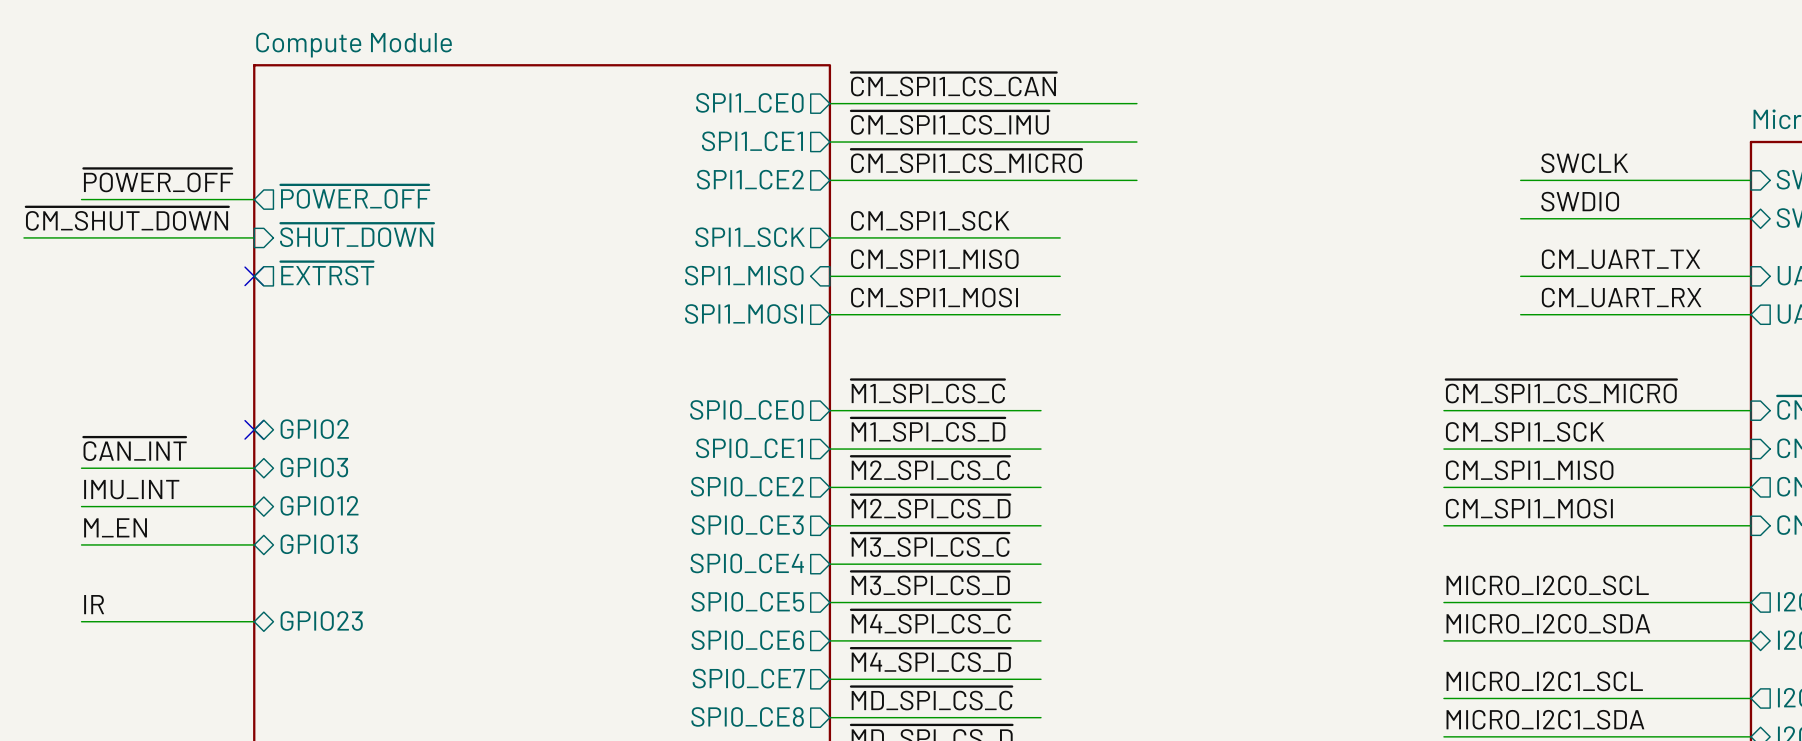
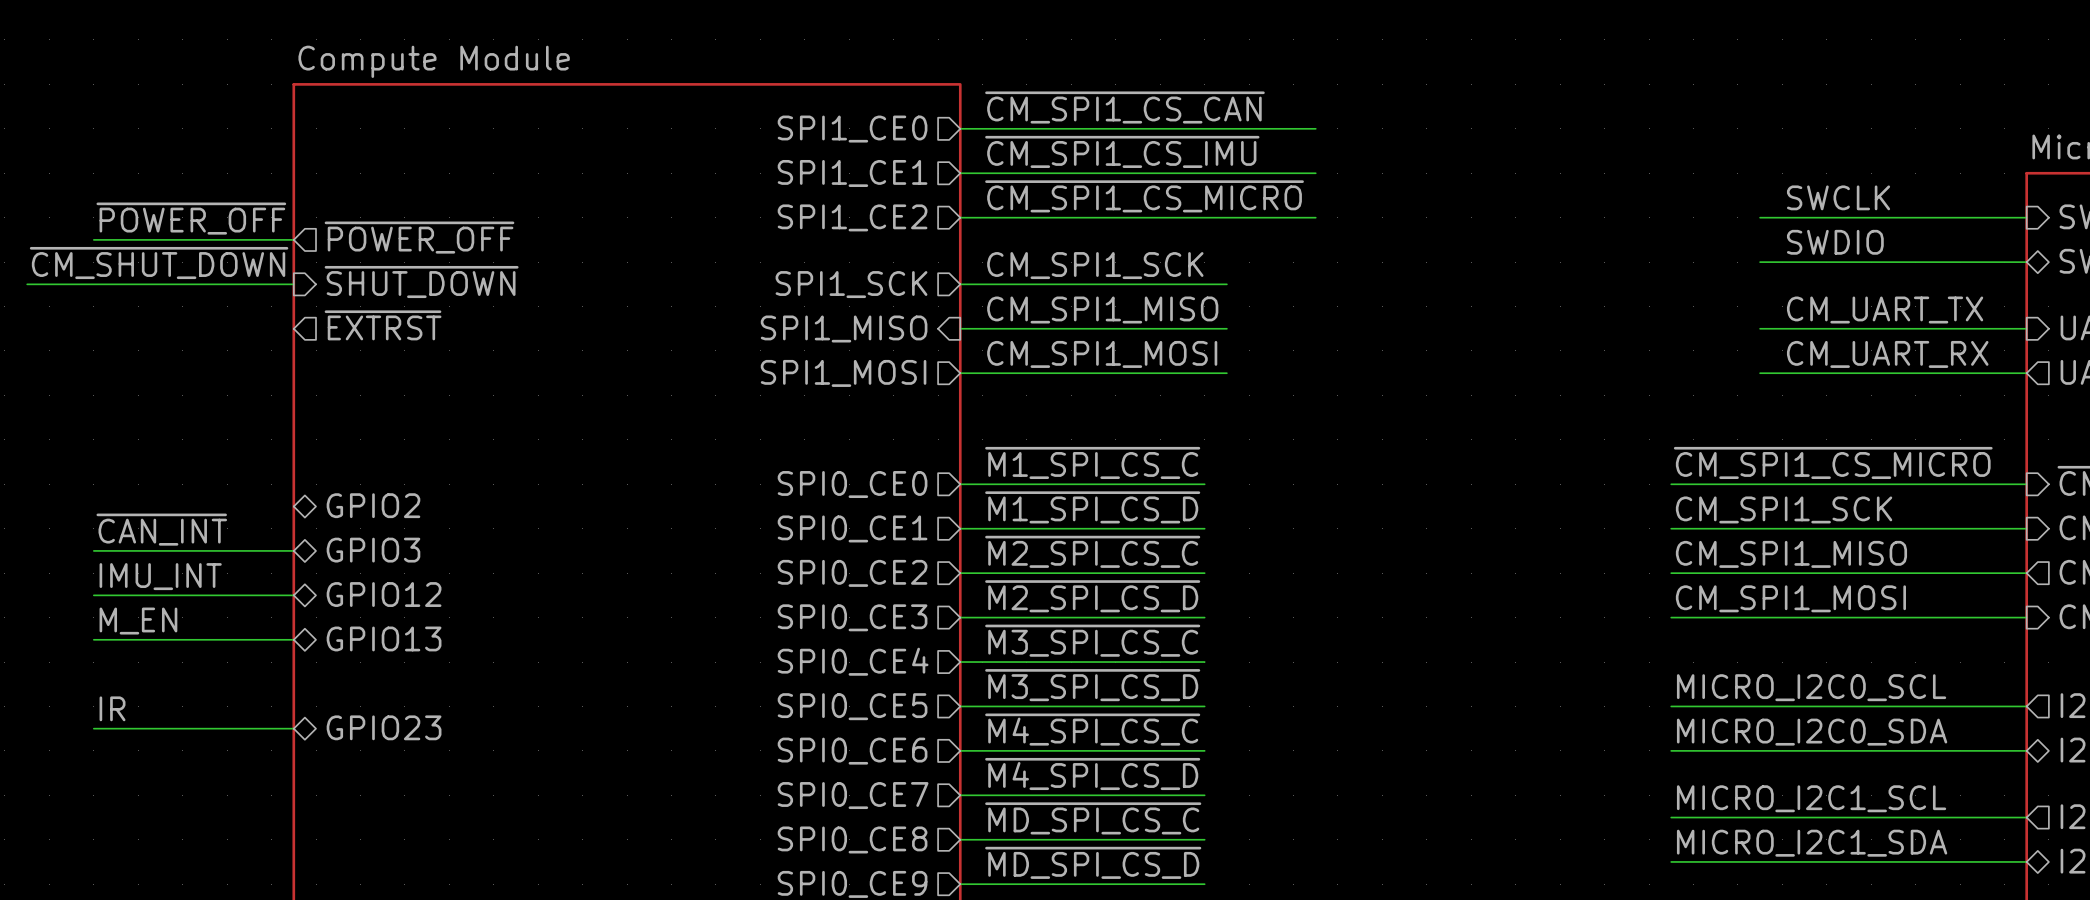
no-connect mark: (254, 276) -> none
no-connect mark: (254, 429) -> none

